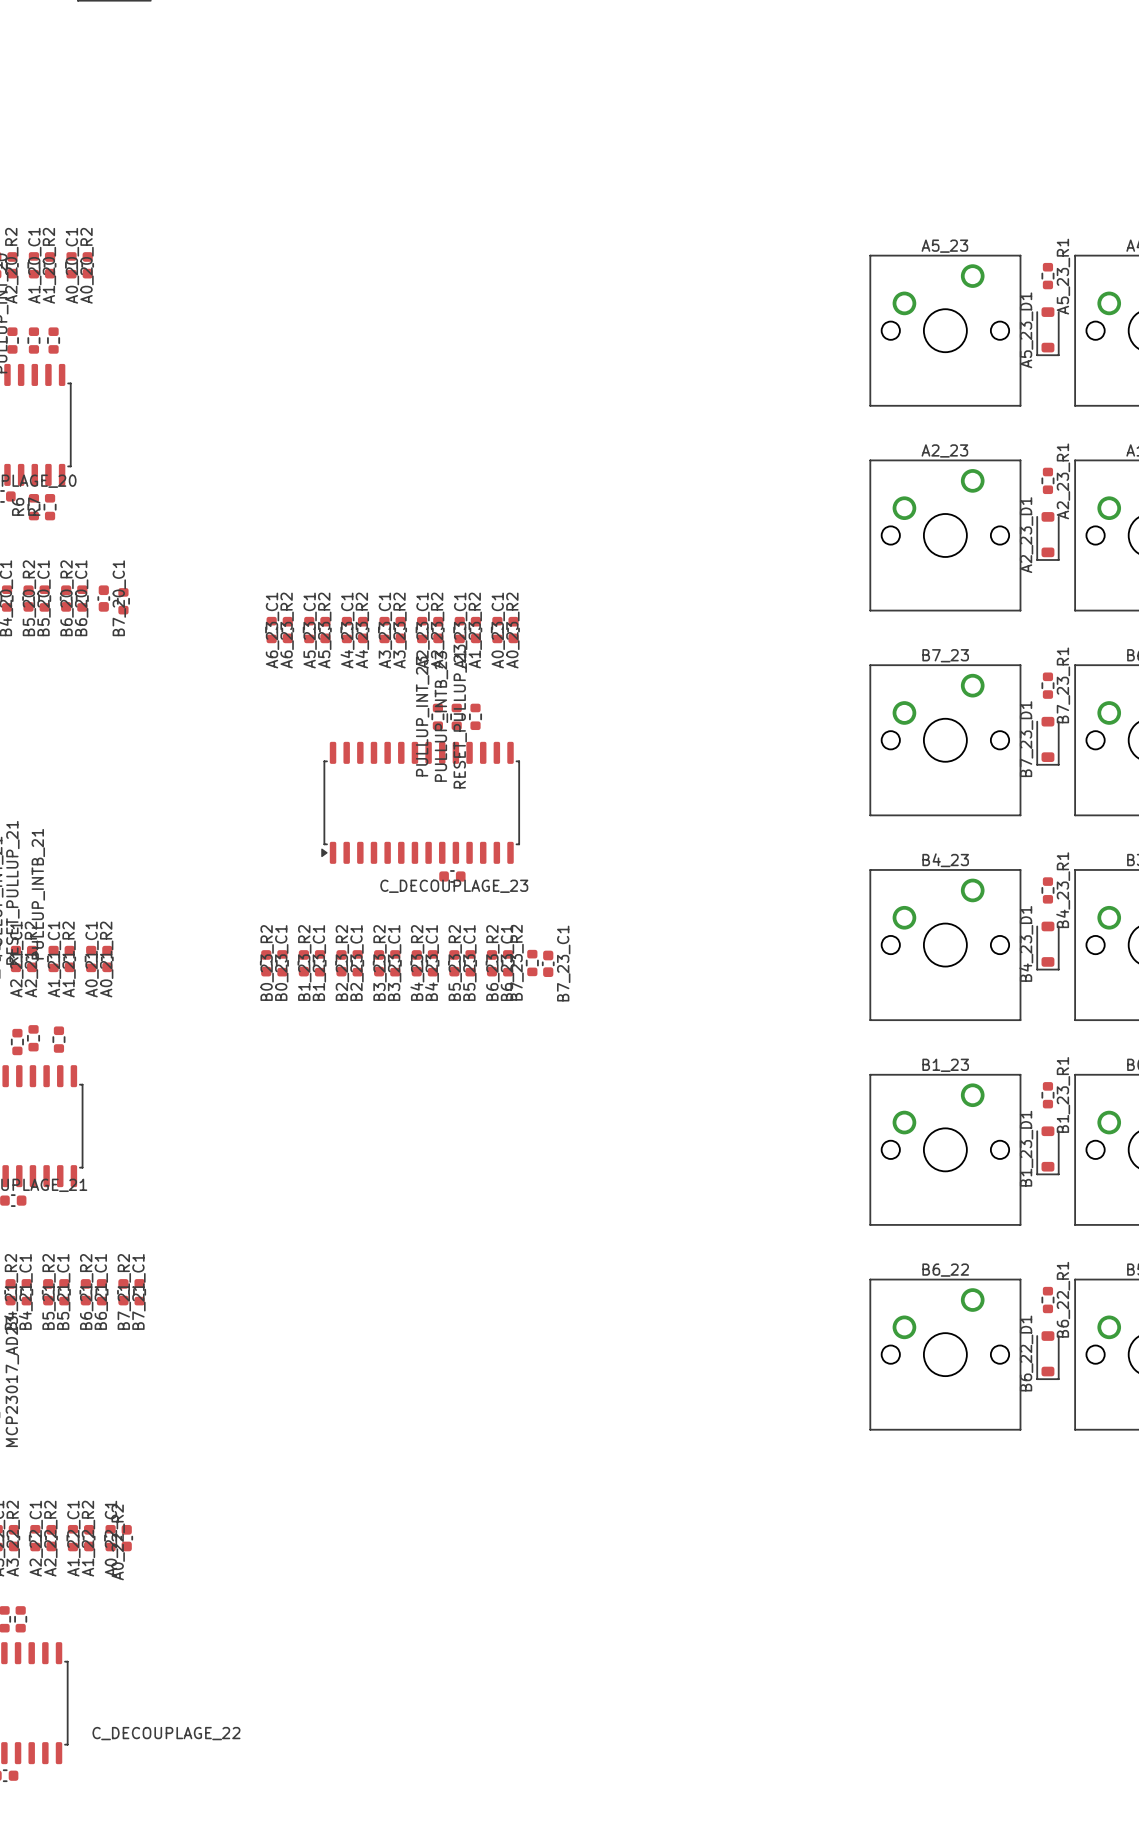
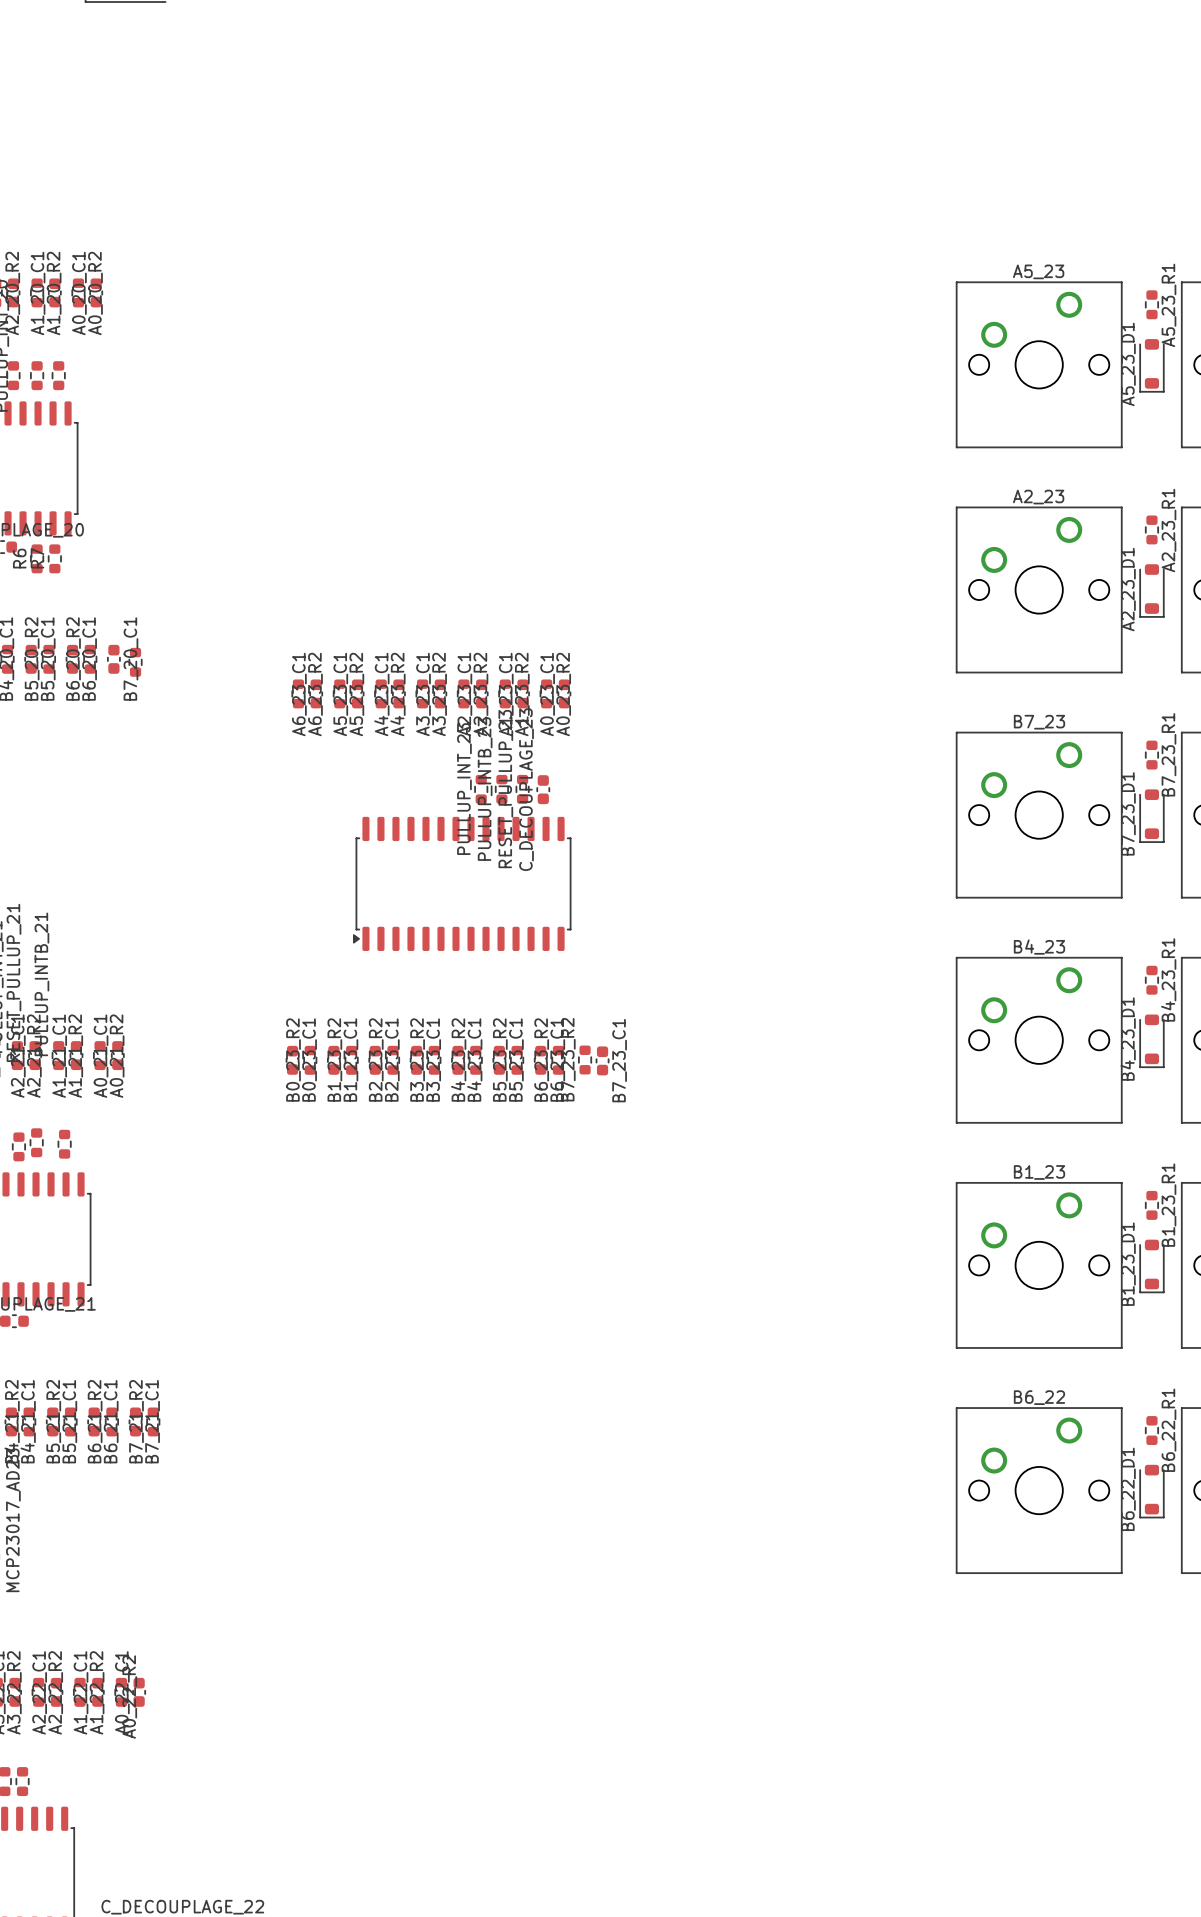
C_DECOUPLAGE_23 rotation: 0° (452, 876) -> 90° clockwise (543, 789)
C_DECOUPLAGE_23 position: (452, 876) -> (543, 789)

